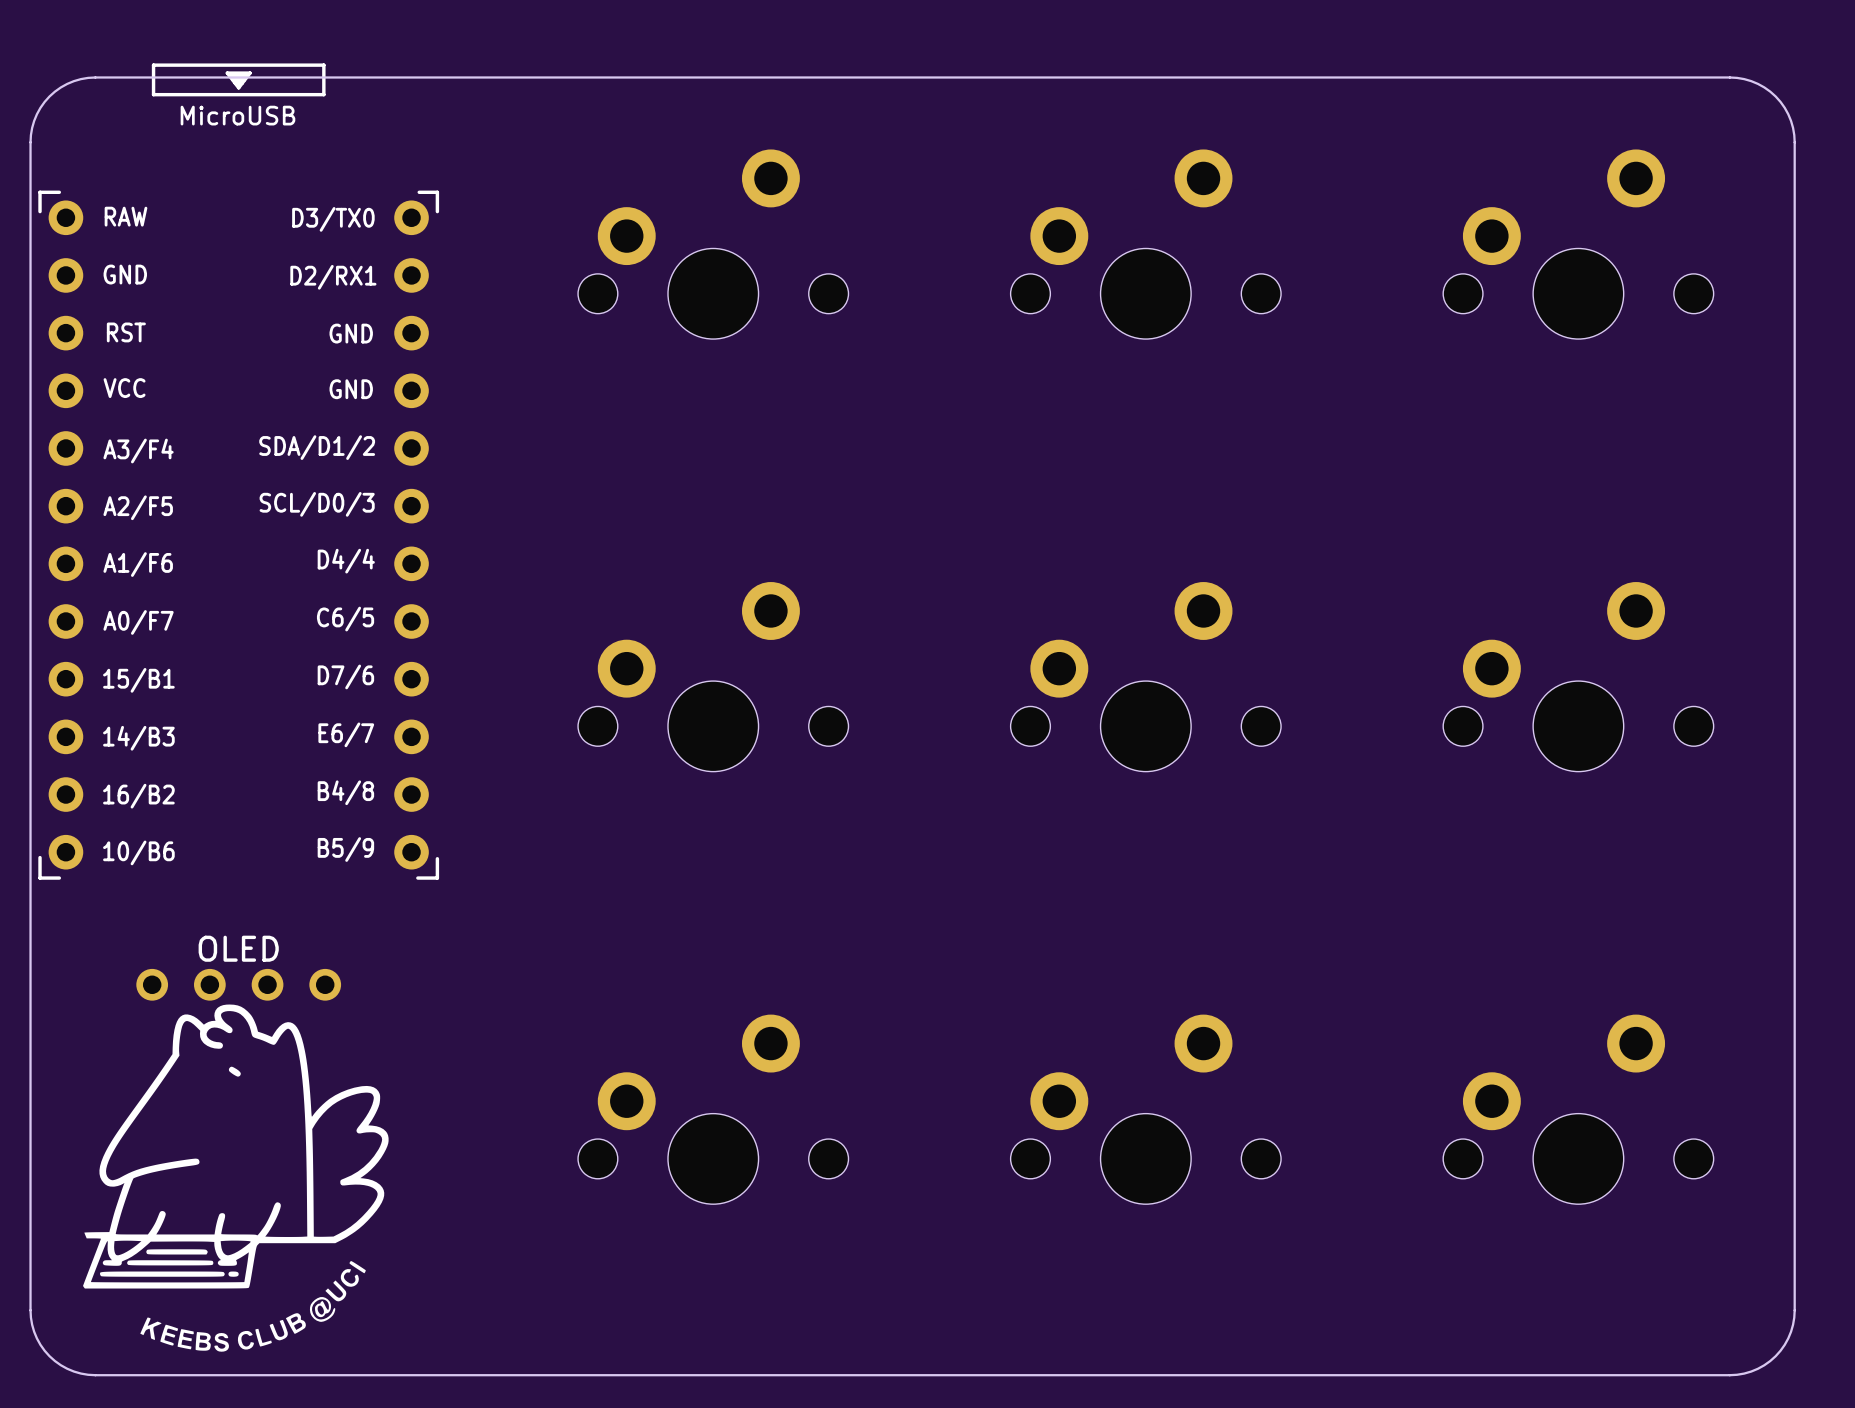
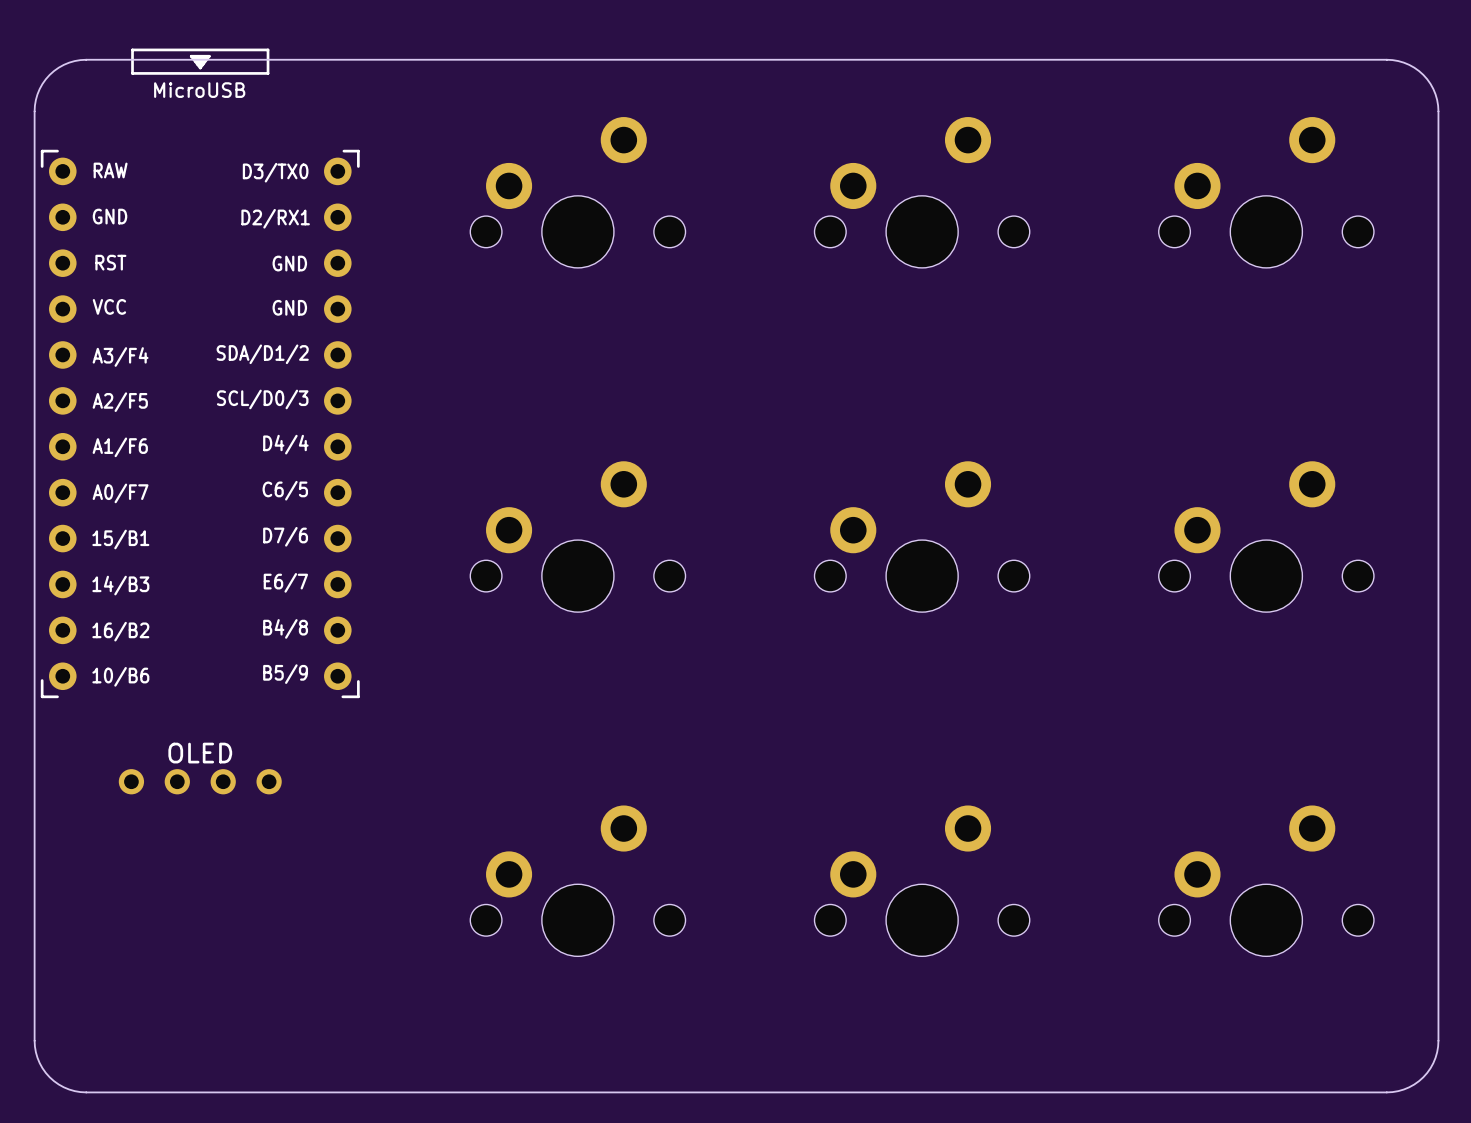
drawing: [83, 1004, 389, 1352] -> none

